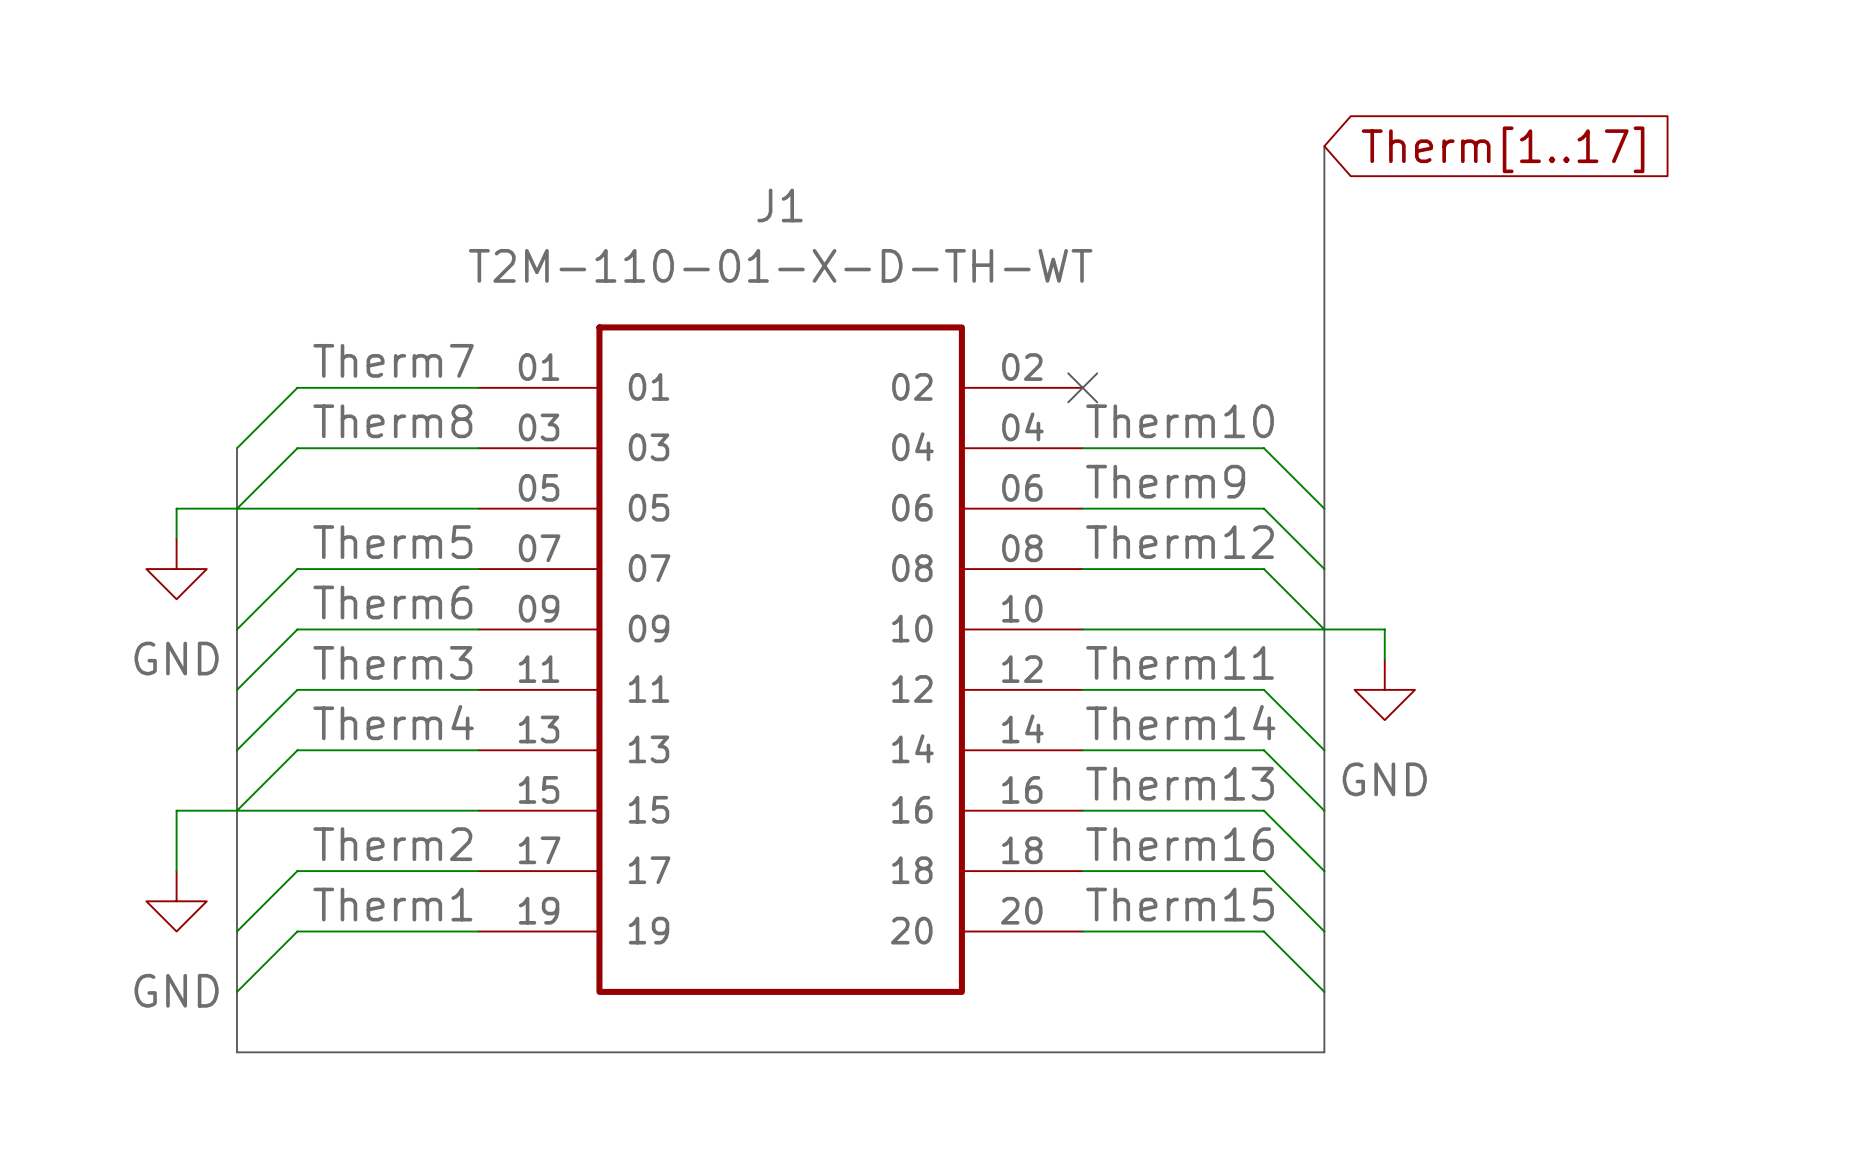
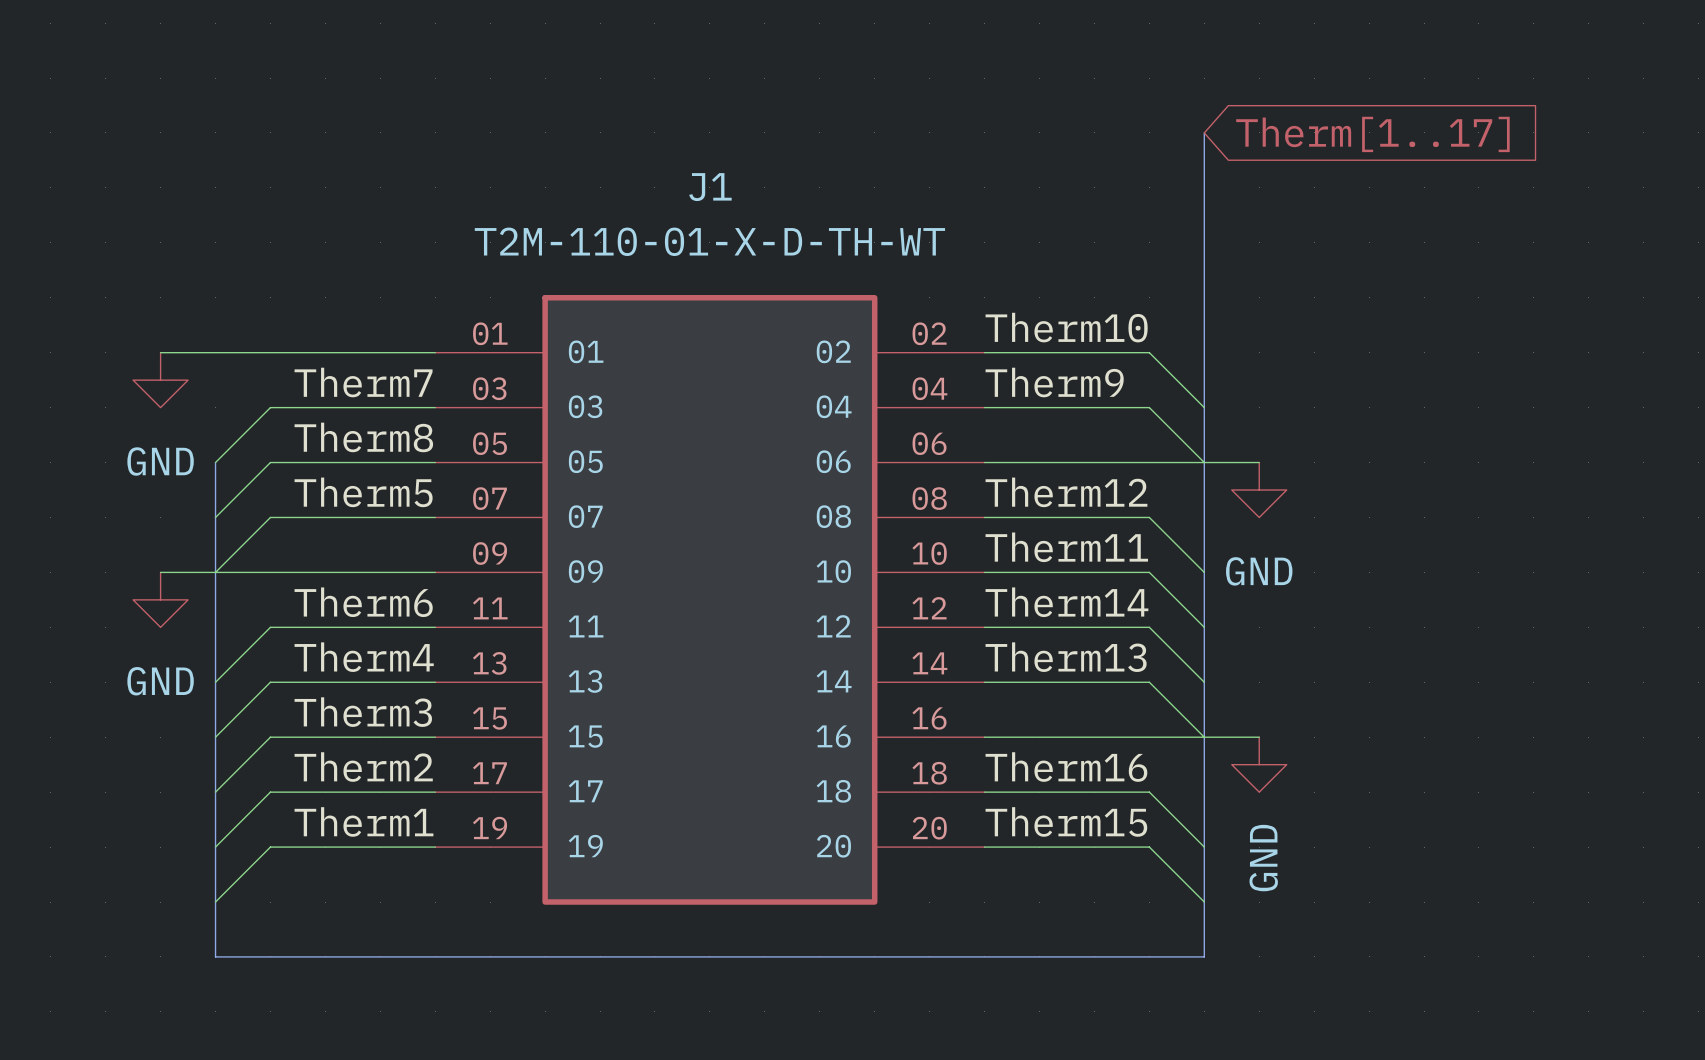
label: Therm7 (393, 360) -> none
label: none -> Therm10 (1066, 327)
wire: (297, 387) (237, 448) -> (270, 352) (160, 352)
wire: none -> (984, 352) (1149, 352) (1204, 407)
no-connect mark: (1082, 387) -> none
power symbol: none -> GND (160, 380)
label: Therm8 (392, 421) -> Therm7 (363, 382)
label: Therm10 (1180, 421) -> Therm9 (1054, 382)
bus: (237, 448) (237, 508) -> none
label: none -> Therm8 (363, 437)
label: Therm9 (1165, 481) -> none
wire: (297, 508) (176, 508) (176, 538) -> (270, 462) (215, 517)
wire: (1263, 508) (1324, 569) -> (1149, 462) (1259, 462)
power symbol: none -> GND (1259, 490)
power symbol: GND (176, 569) -> none
label: Therm6 (392, 602) -> none
label: none -> Therm11 (1066, 547)
wire: (297, 629) (237, 689) -> (270, 572) (160, 572)
wire: (1263, 629) (1384, 629) (1384, 659) -> (1149, 572) (1204, 627)
power symbol: none -> GND (160, 599)
label: Therm3 (392, 662) -> Therm6 (363, 602)
label: Therm11 (1180, 662) -> Therm14 (1066, 602)
power symbol: GND (1384, 689) -> none
label: Therm14 (1180, 722) -> Therm13 (1066, 657)
label: none -> Therm3 (363, 712)
label: Therm13 (1180, 783) -> none
wire: (297, 810) (176, 810) (176, 871) -> (270, 737) (215, 792)
wire: (1263, 810) (1324, 871) -> (1149, 737) (1259, 737)
power symbol: none -> GND (1259, 764)
power symbol: GND (176, 901) -> none

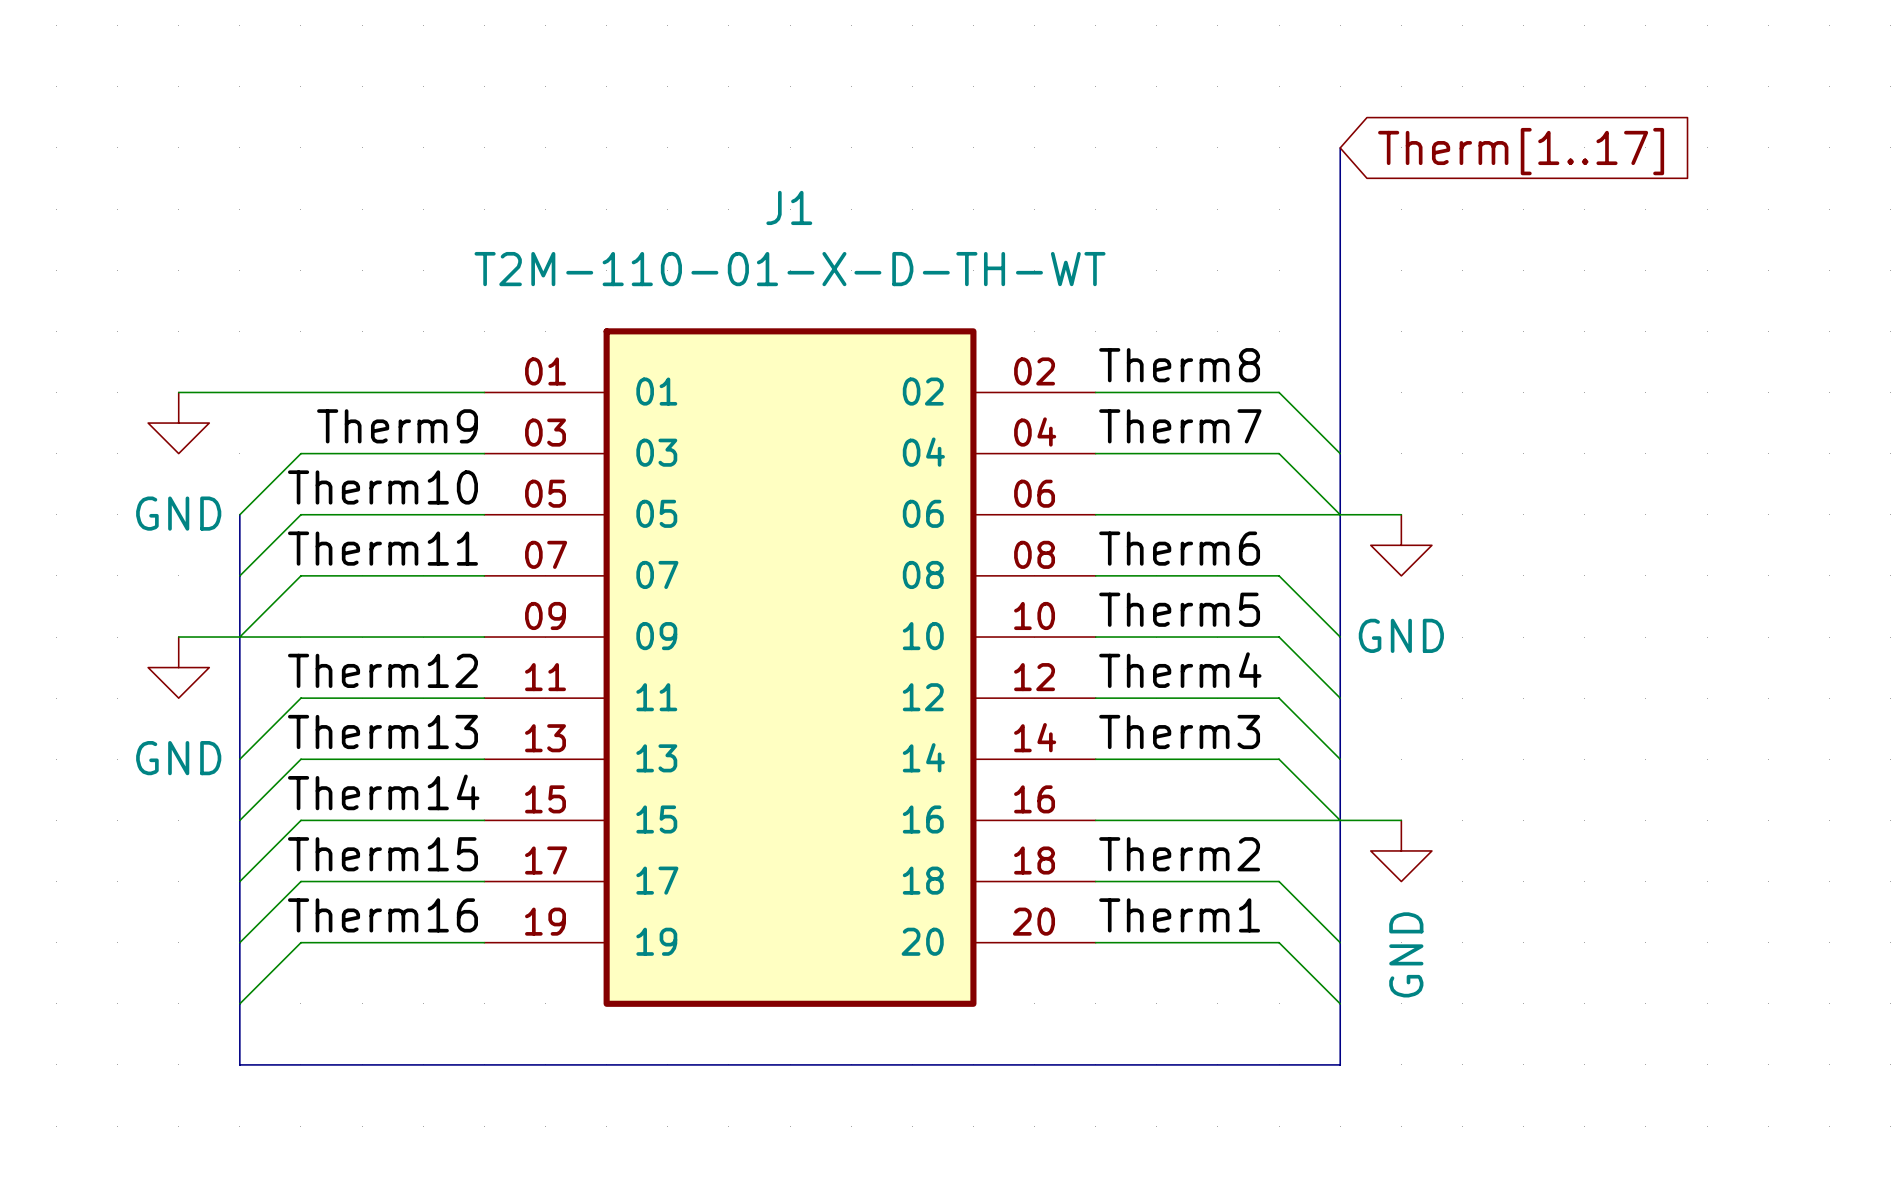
label: Therm10 (1066, 327) -> Therm8 (1179, 365)
label: Therm7 (363, 382) -> Therm9 (397, 426)
label: Therm9 (1054, 382) -> Therm7 (1180, 426)
label: Therm8 (363, 437) -> Therm10 (382, 487)
label: Therm5 (363, 492) -> Therm11 (382, 548)
label: Therm12 (1066, 492) -> Therm6 (1179, 548)
label: Therm11 (1066, 547) -> Therm5 (1179, 609)
label: Therm6 (363, 602) -> Therm12 (382, 670)
label: Therm14 (1066, 602) -> Therm4 (1180, 670)
label: Therm4 (364, 657) -> Therm13 (382, 731)
label: Therm13 (1066, 657) -> Therm3 (1179, 731)
label: Therm3 (363, 712) -> Therm14 (383, 792)
label: Therm2 (363, 767) -> Therm15 (382, 854)
label: Therm16 (1066, 767) -> Therm2 (1179, 854)
label: Therm1 (363, 821) -> Therm16 (382, 915)
label: Therm15 (1066, 821) -> Therm1 (1179, 915)

